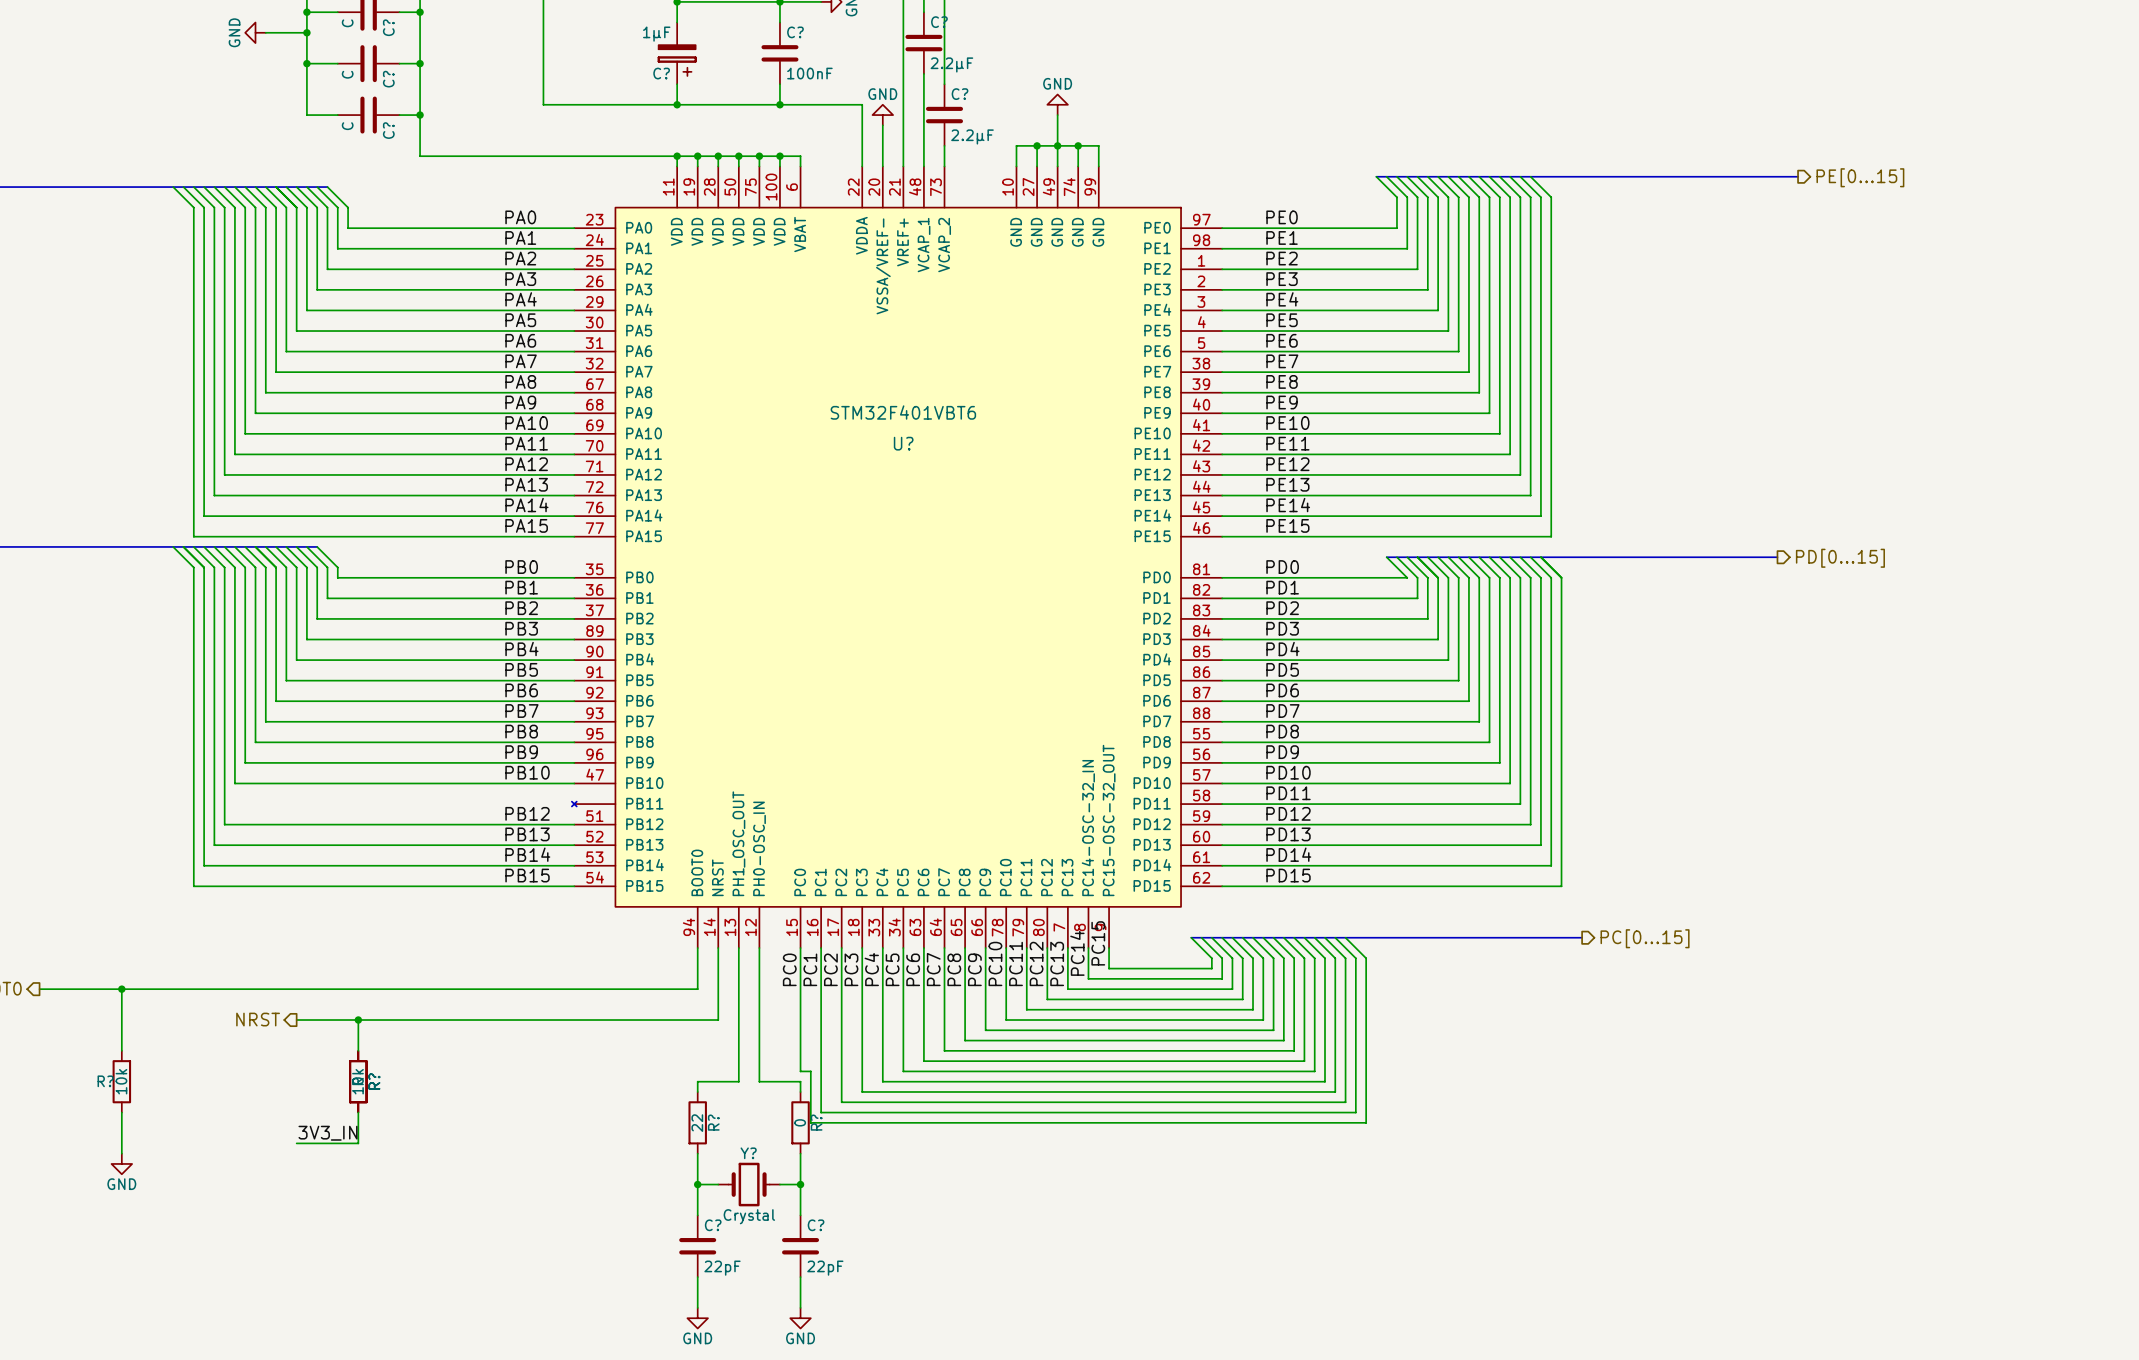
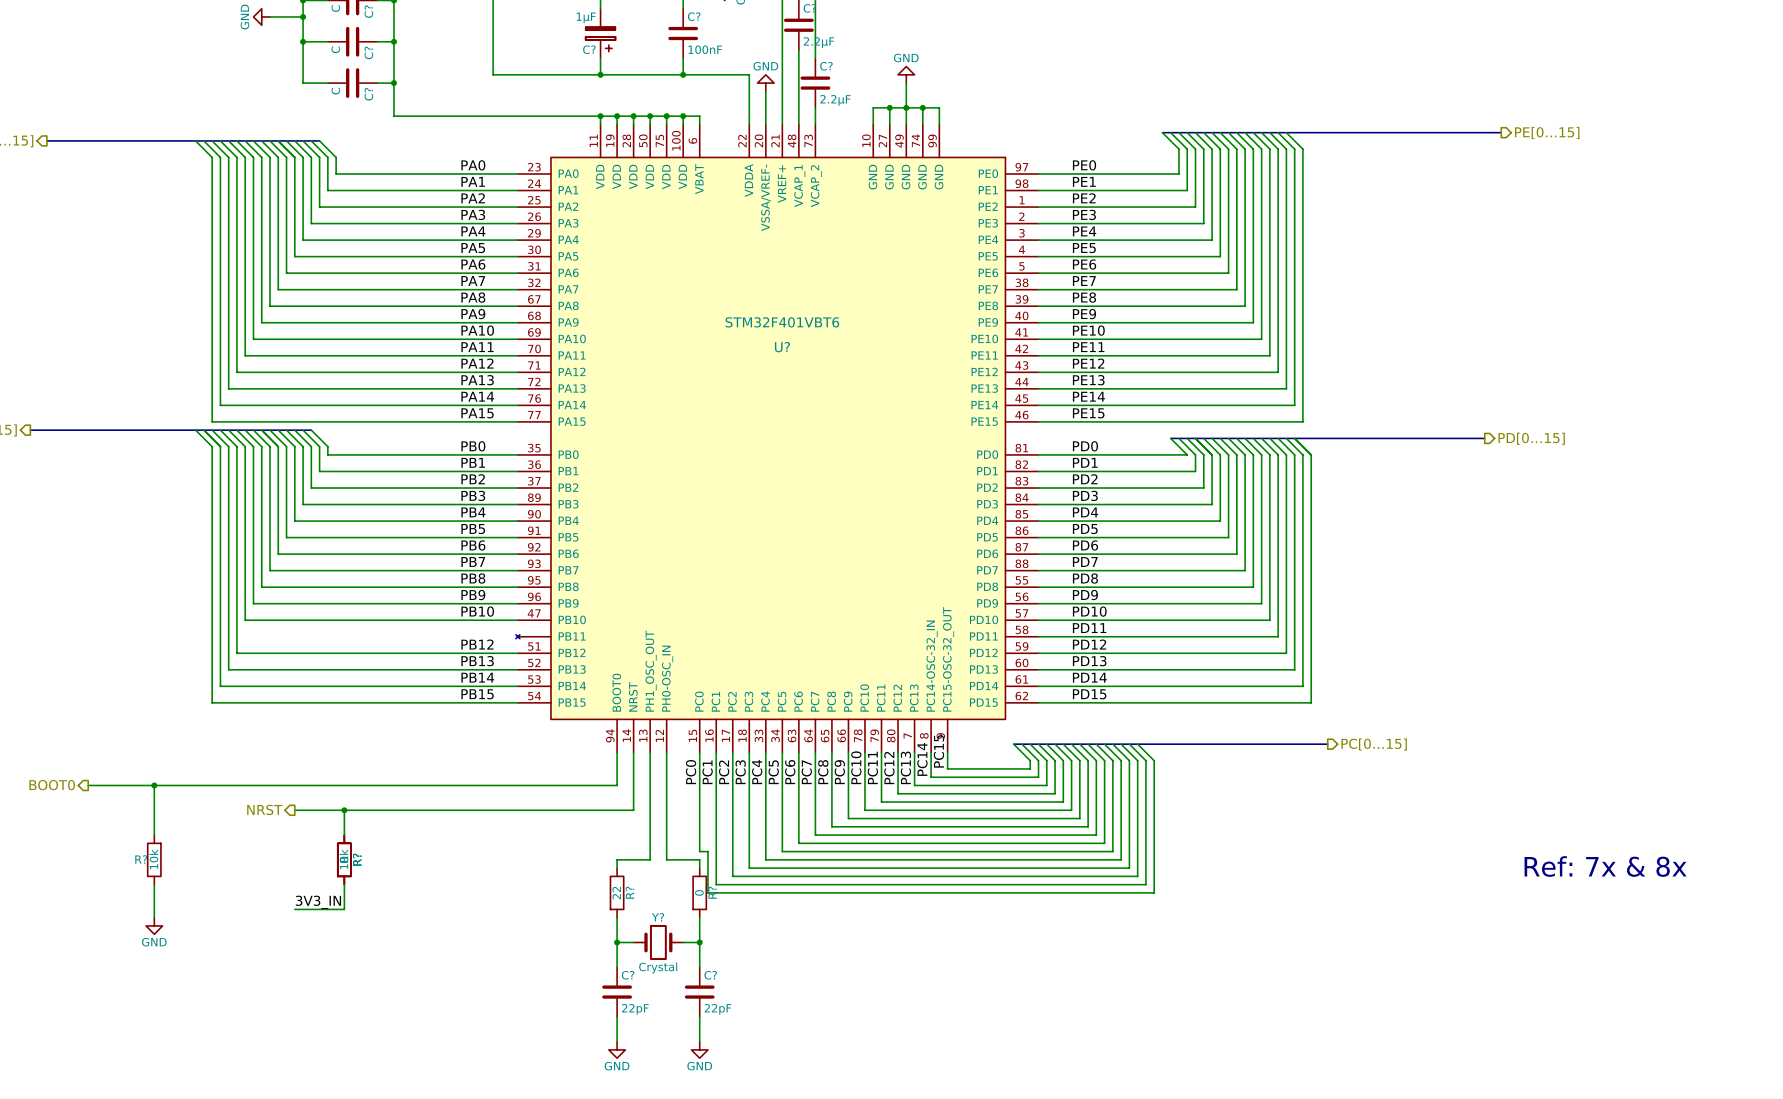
text: none -> Ref: 7x & 8x (1605, 866)

